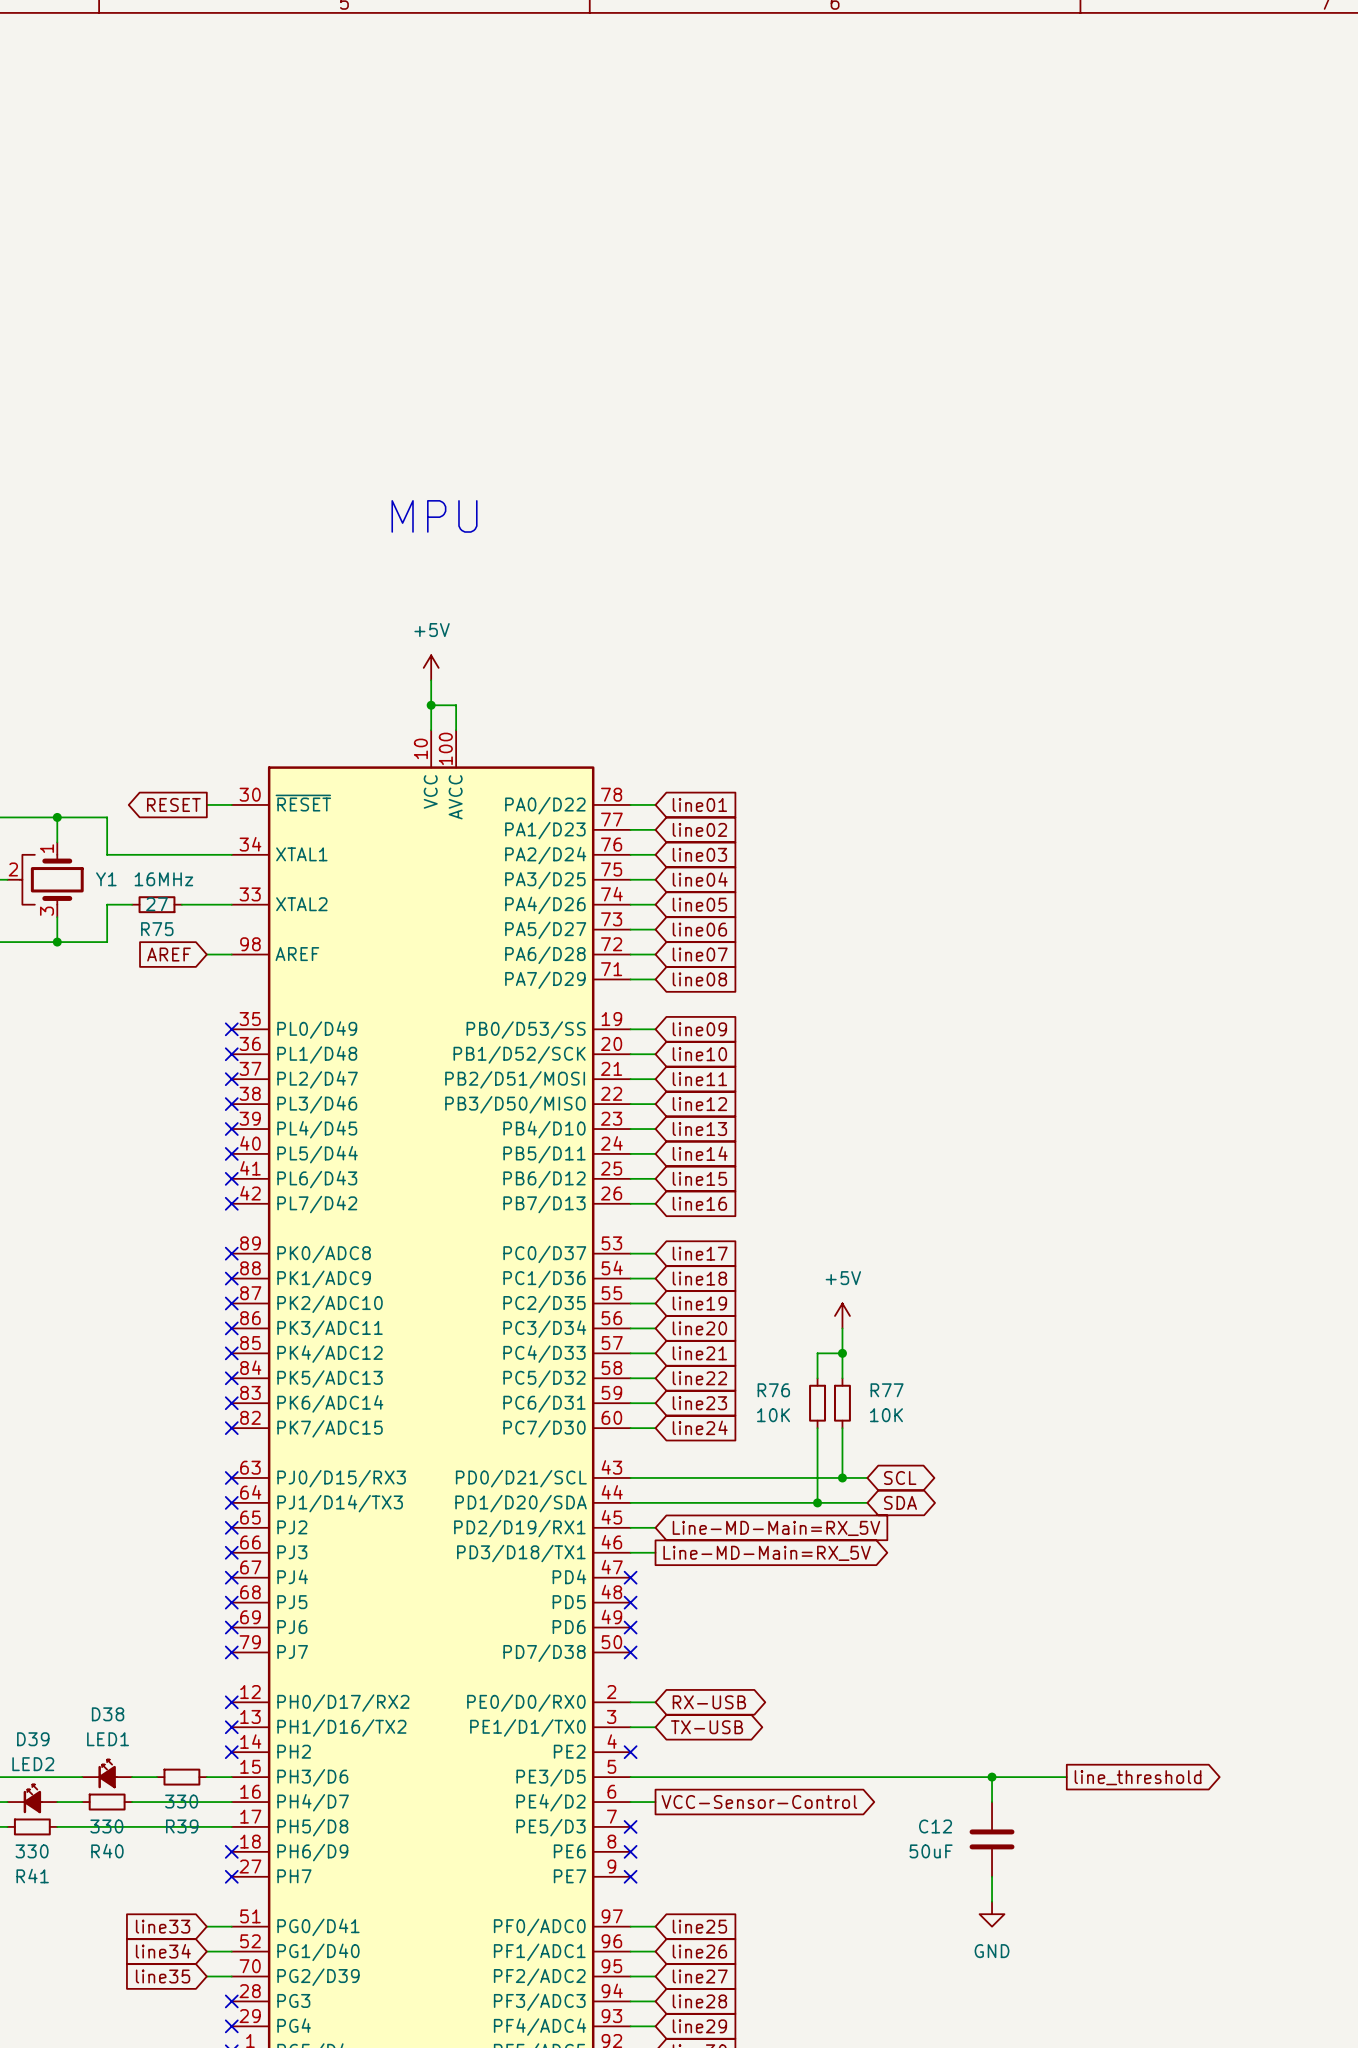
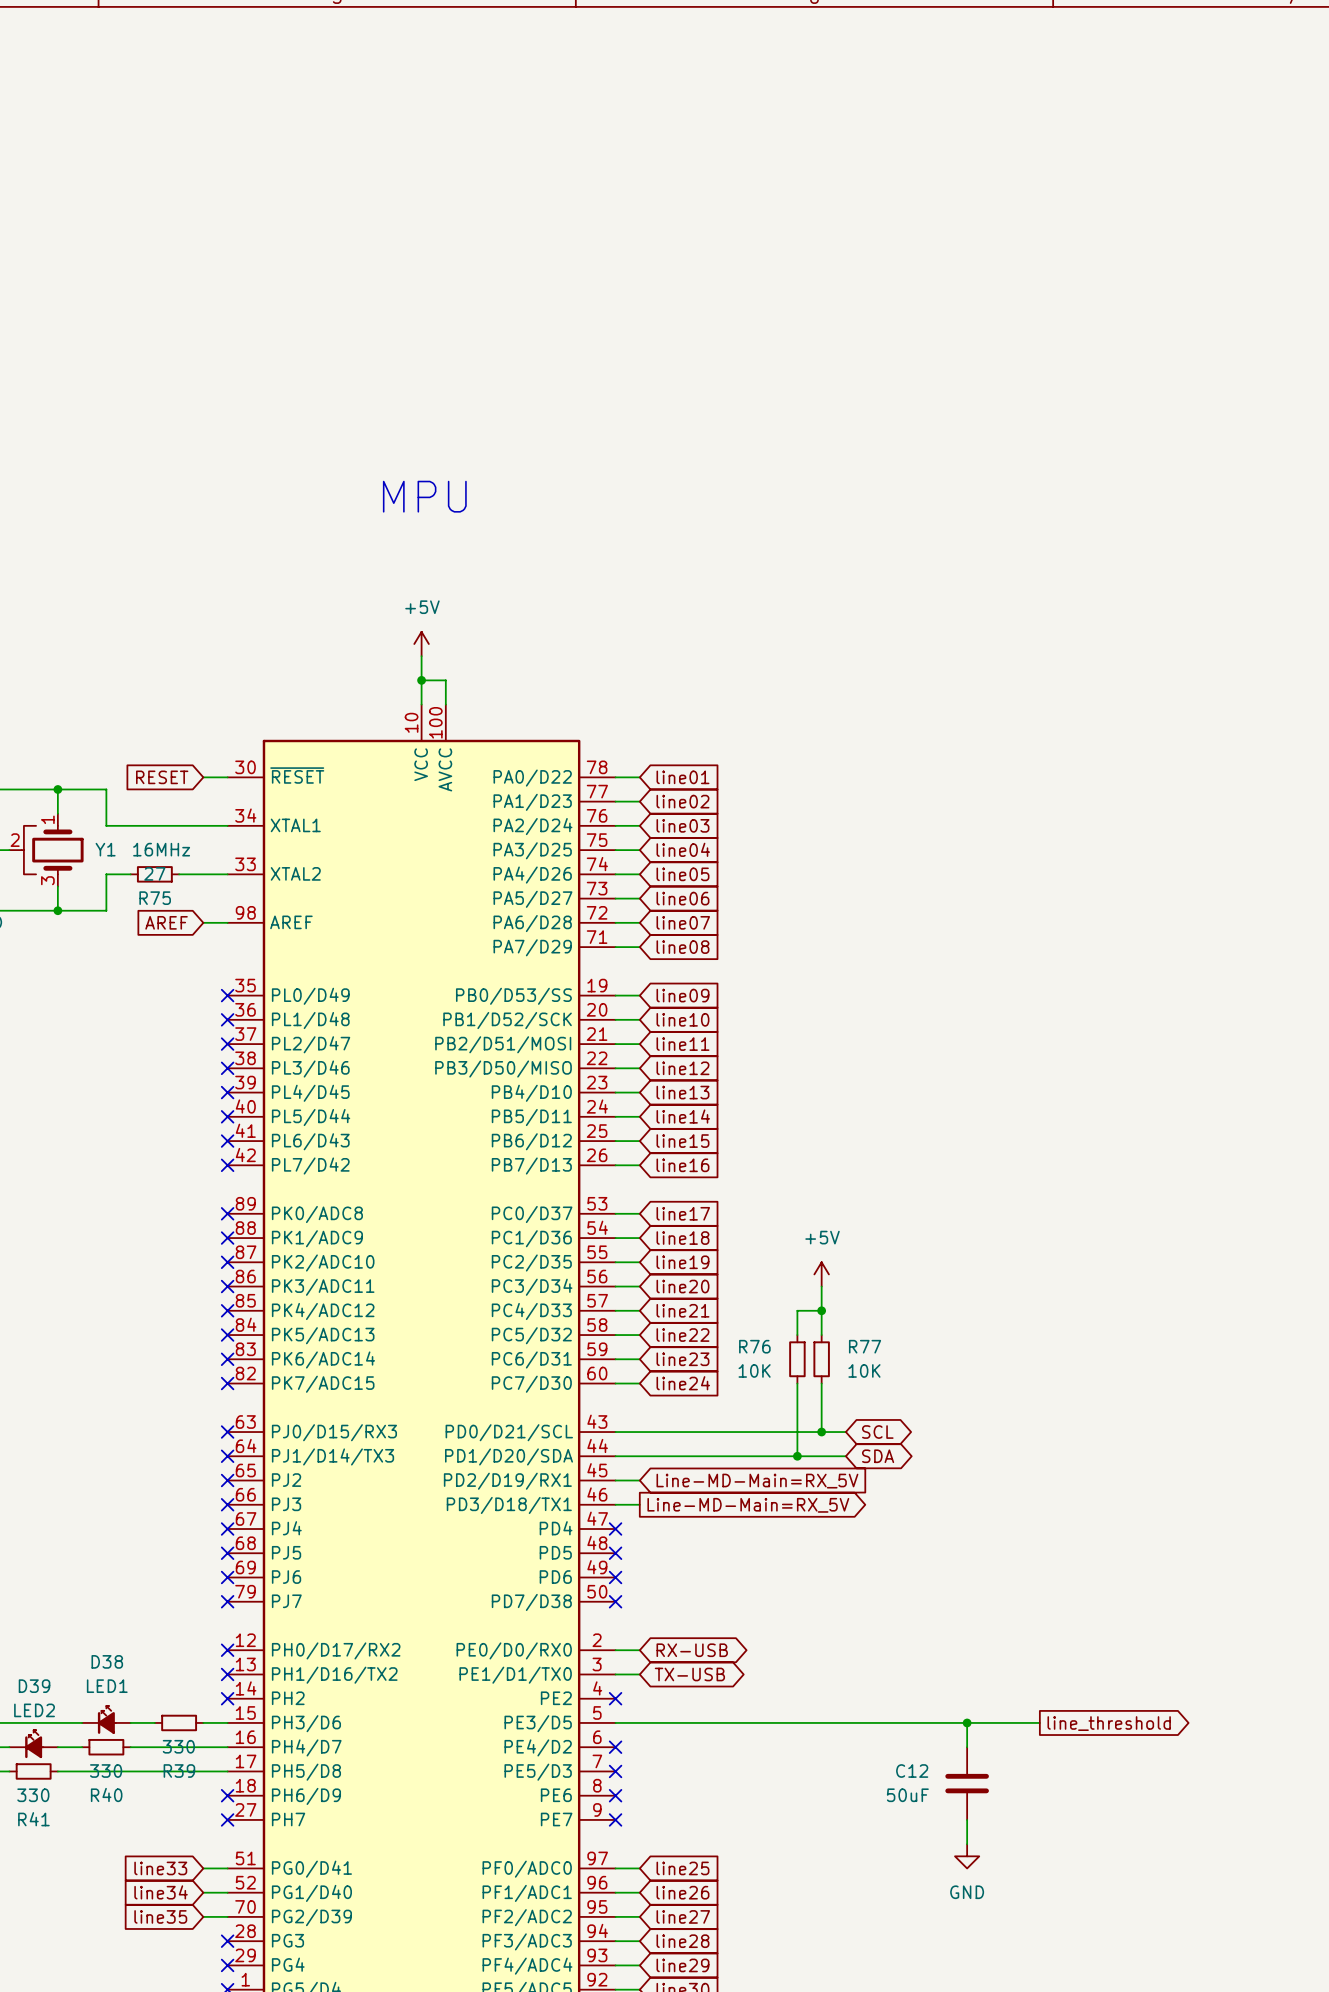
global label shape: output (173, 804) -> input (162, 777)
wire: (630, 1802) (655, 1802) -> none
no-connect mark: none -> (615, 1747)
global label: VCC-Sensor-Control (759, 1802) -> none

